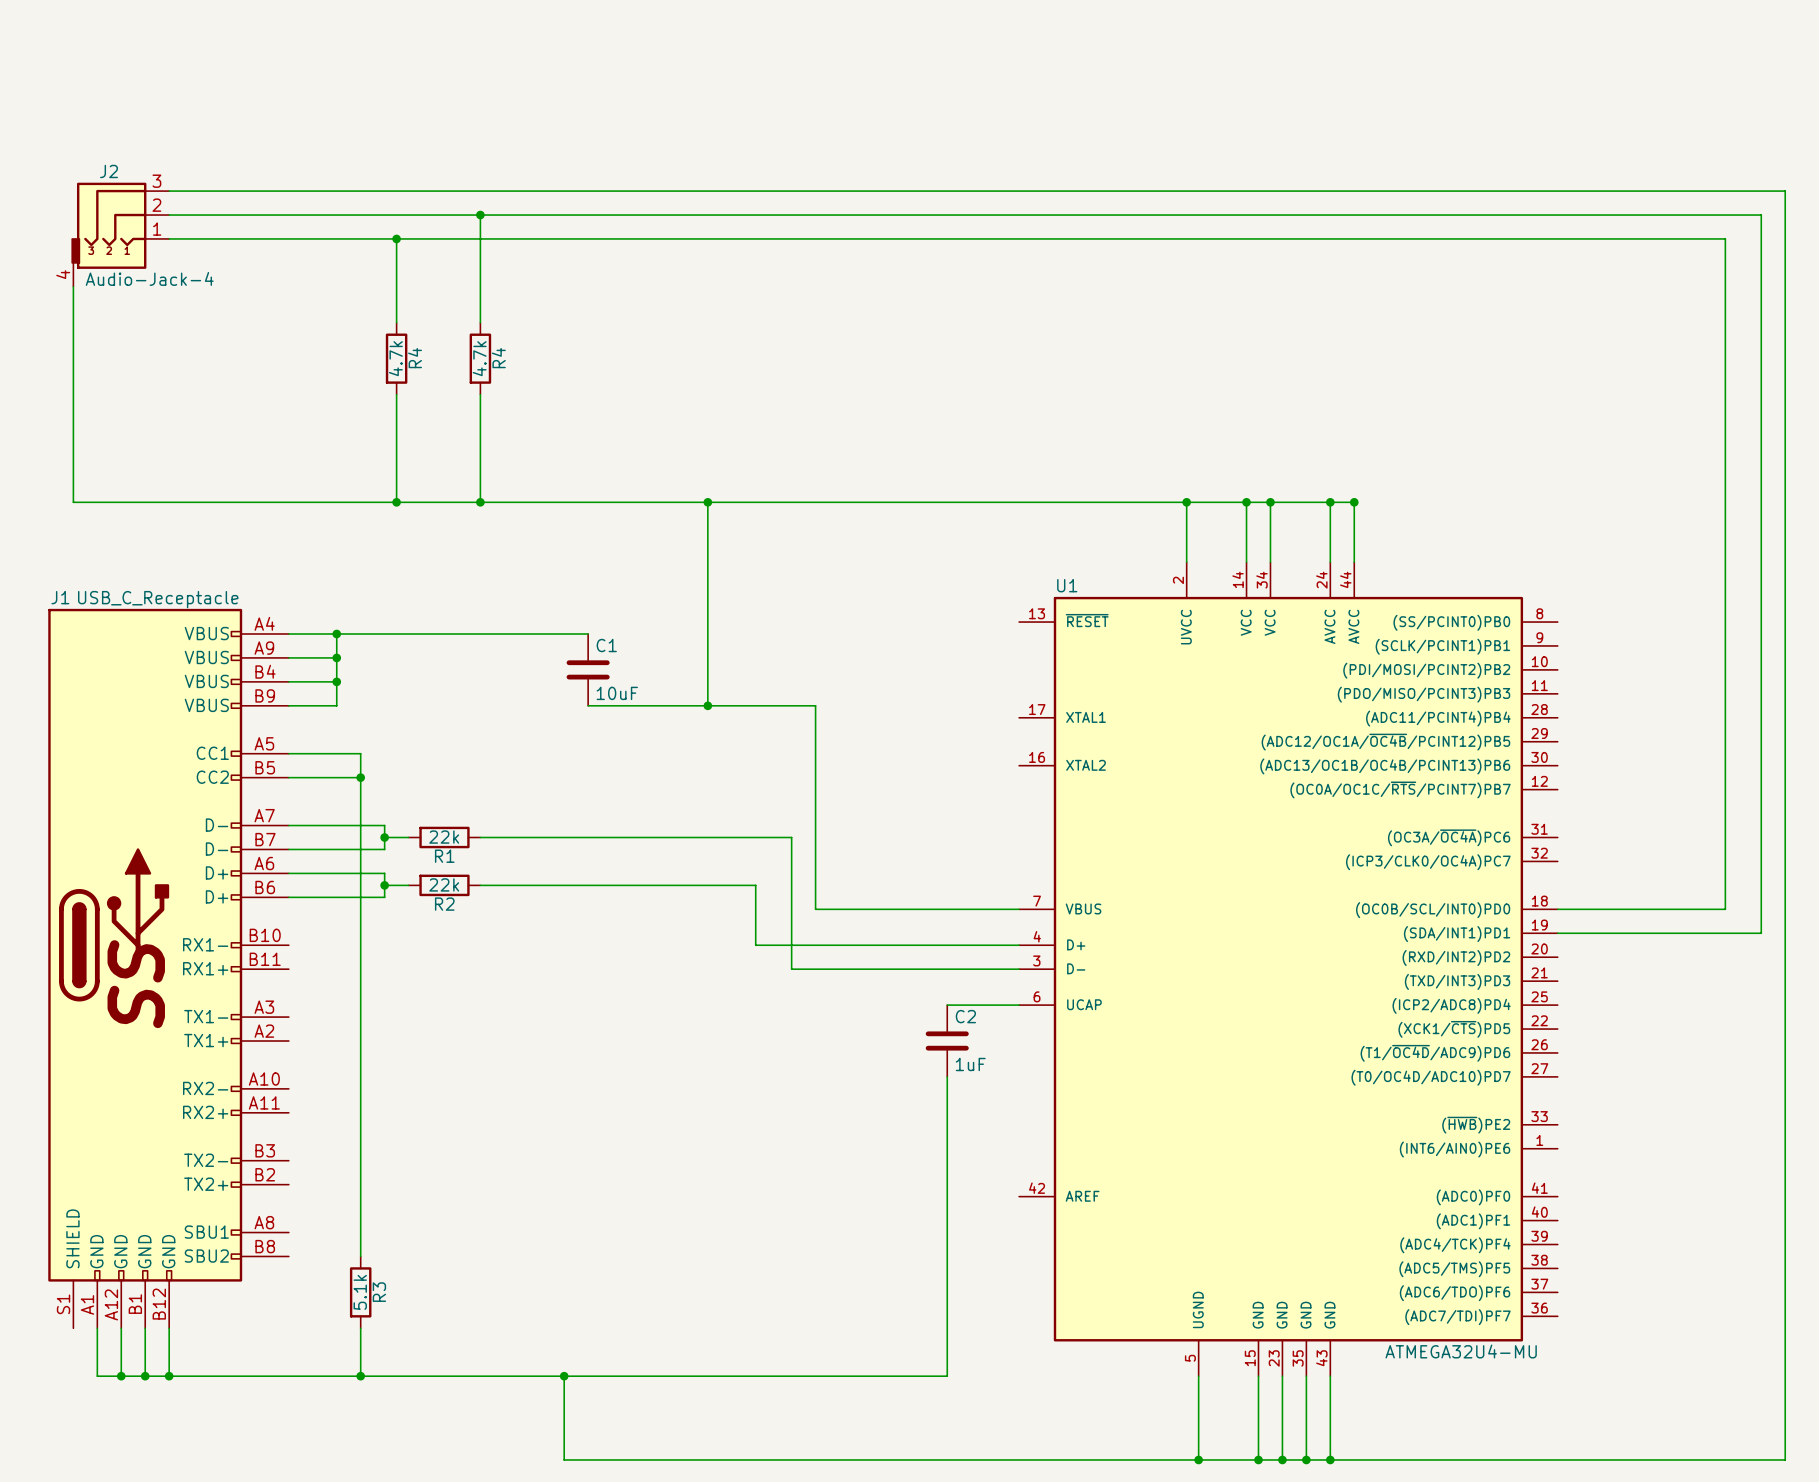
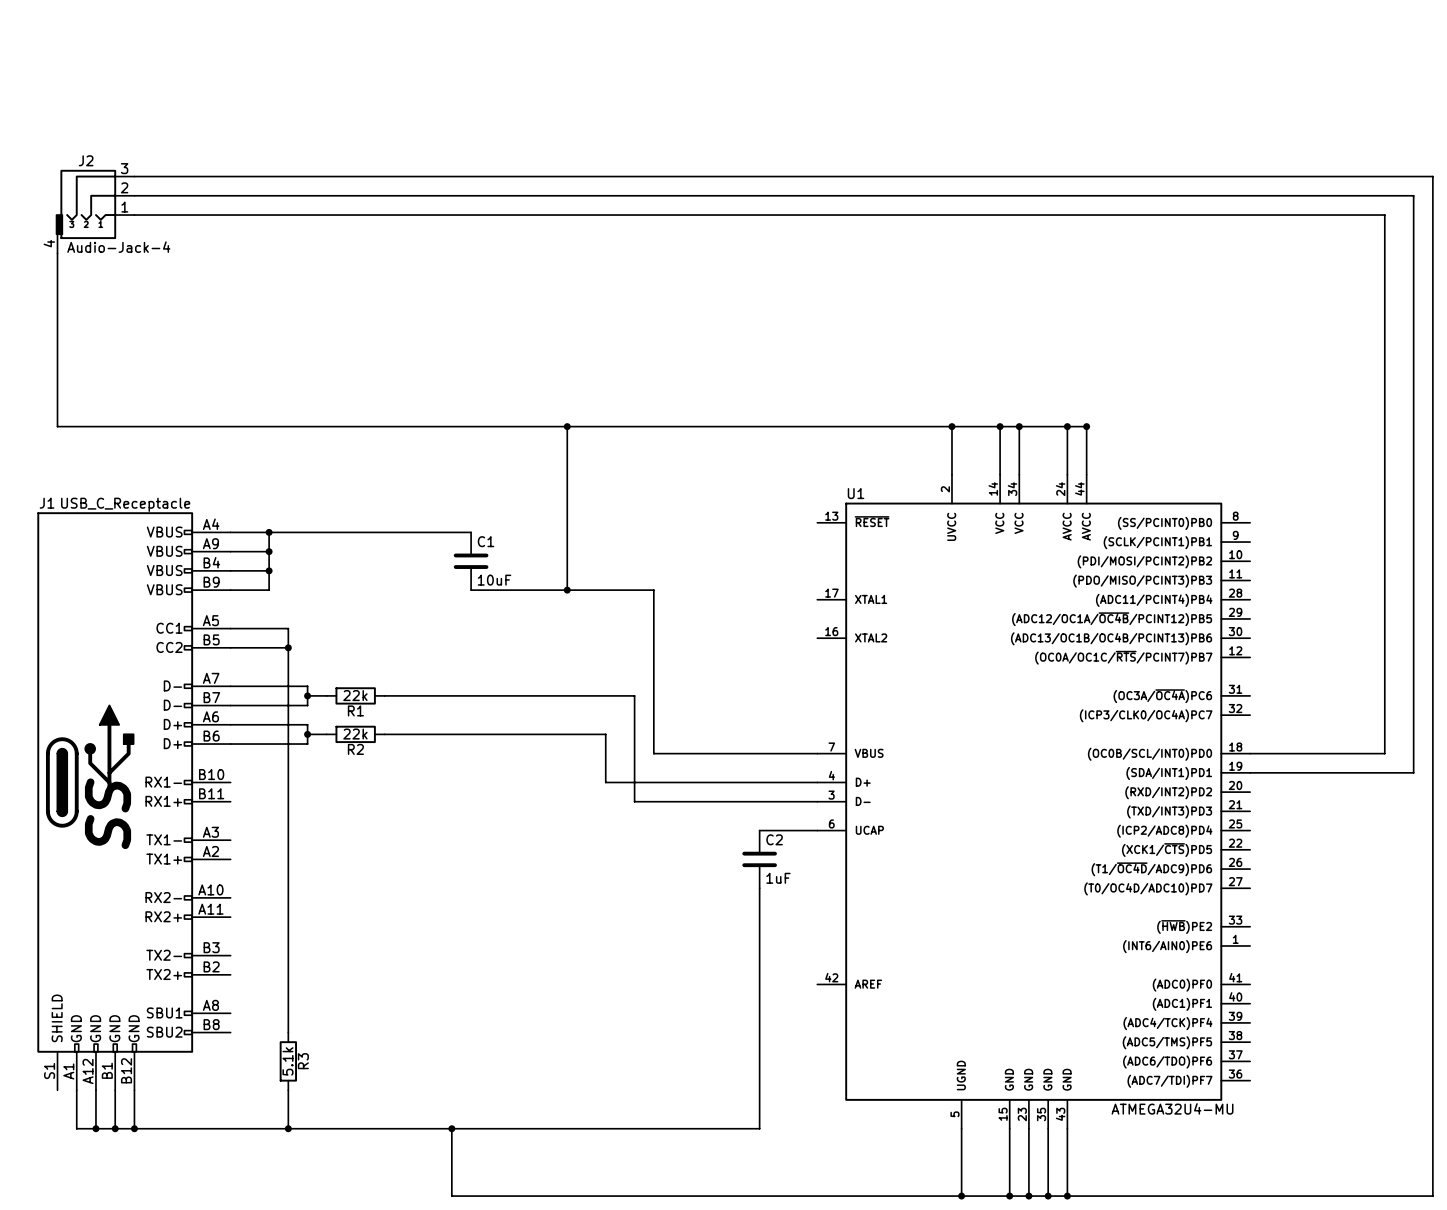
wire: (480, 215) (480, 322) -> none
junction: (480, 215) -> none
wire: (396, 238) (396, 322) -> none
junction: (396, 238) -> none
R4: 4.7k (396, 358) -> none
R4: 4.7k (480, 358) -> none
wire: (396, 394) (396, 502) -> none
wire: (480, 394) (480, 502) -> none
junction: (396, 502) -> none
junction: (480, 502) -> none

